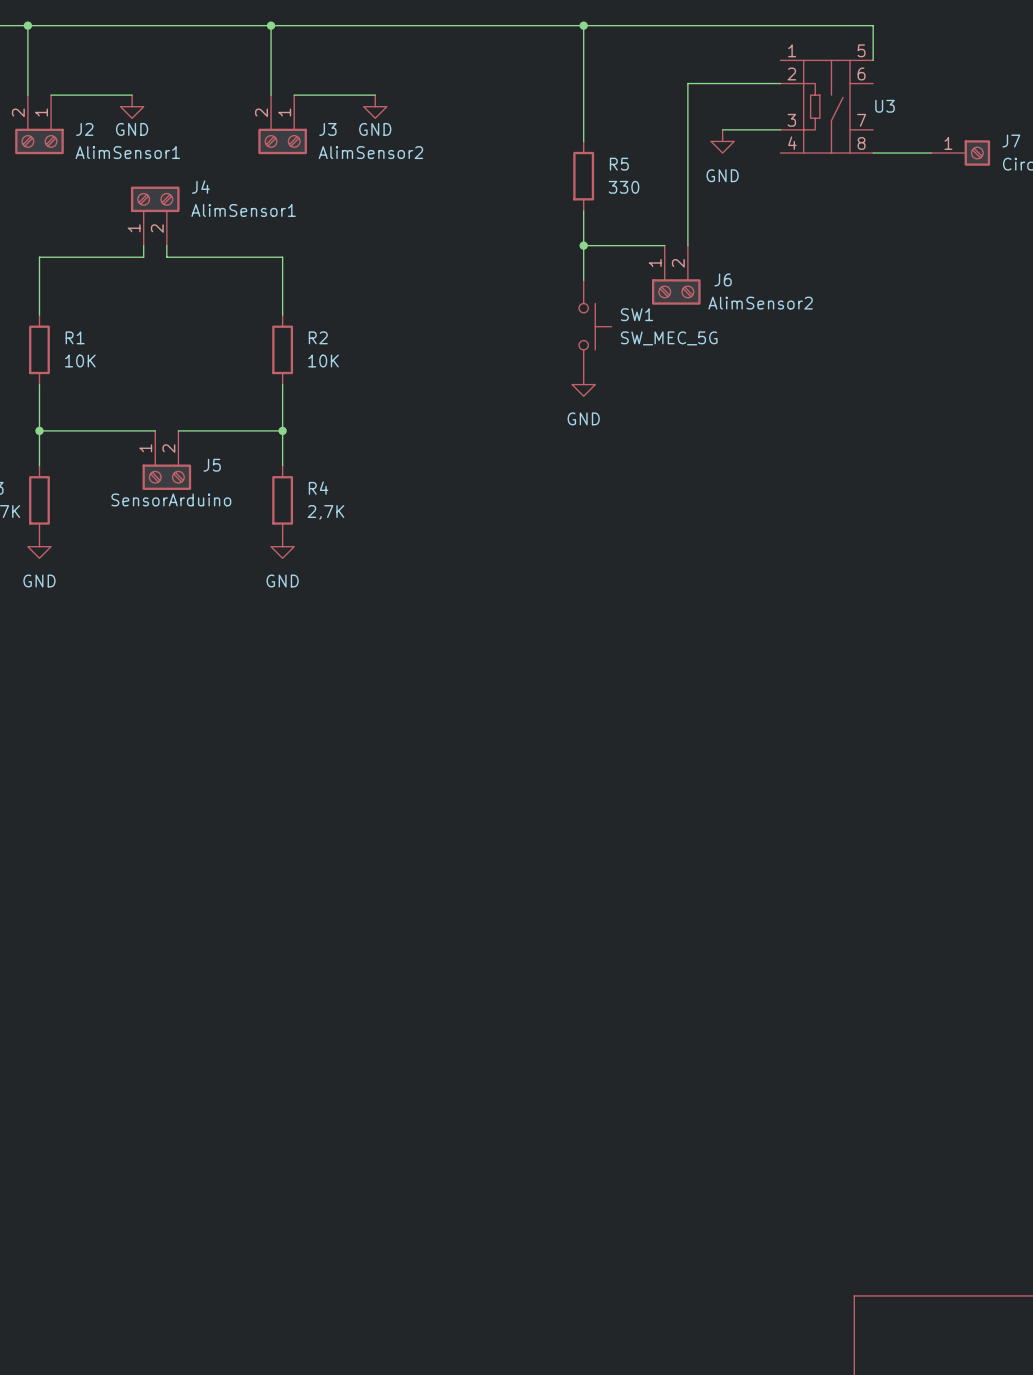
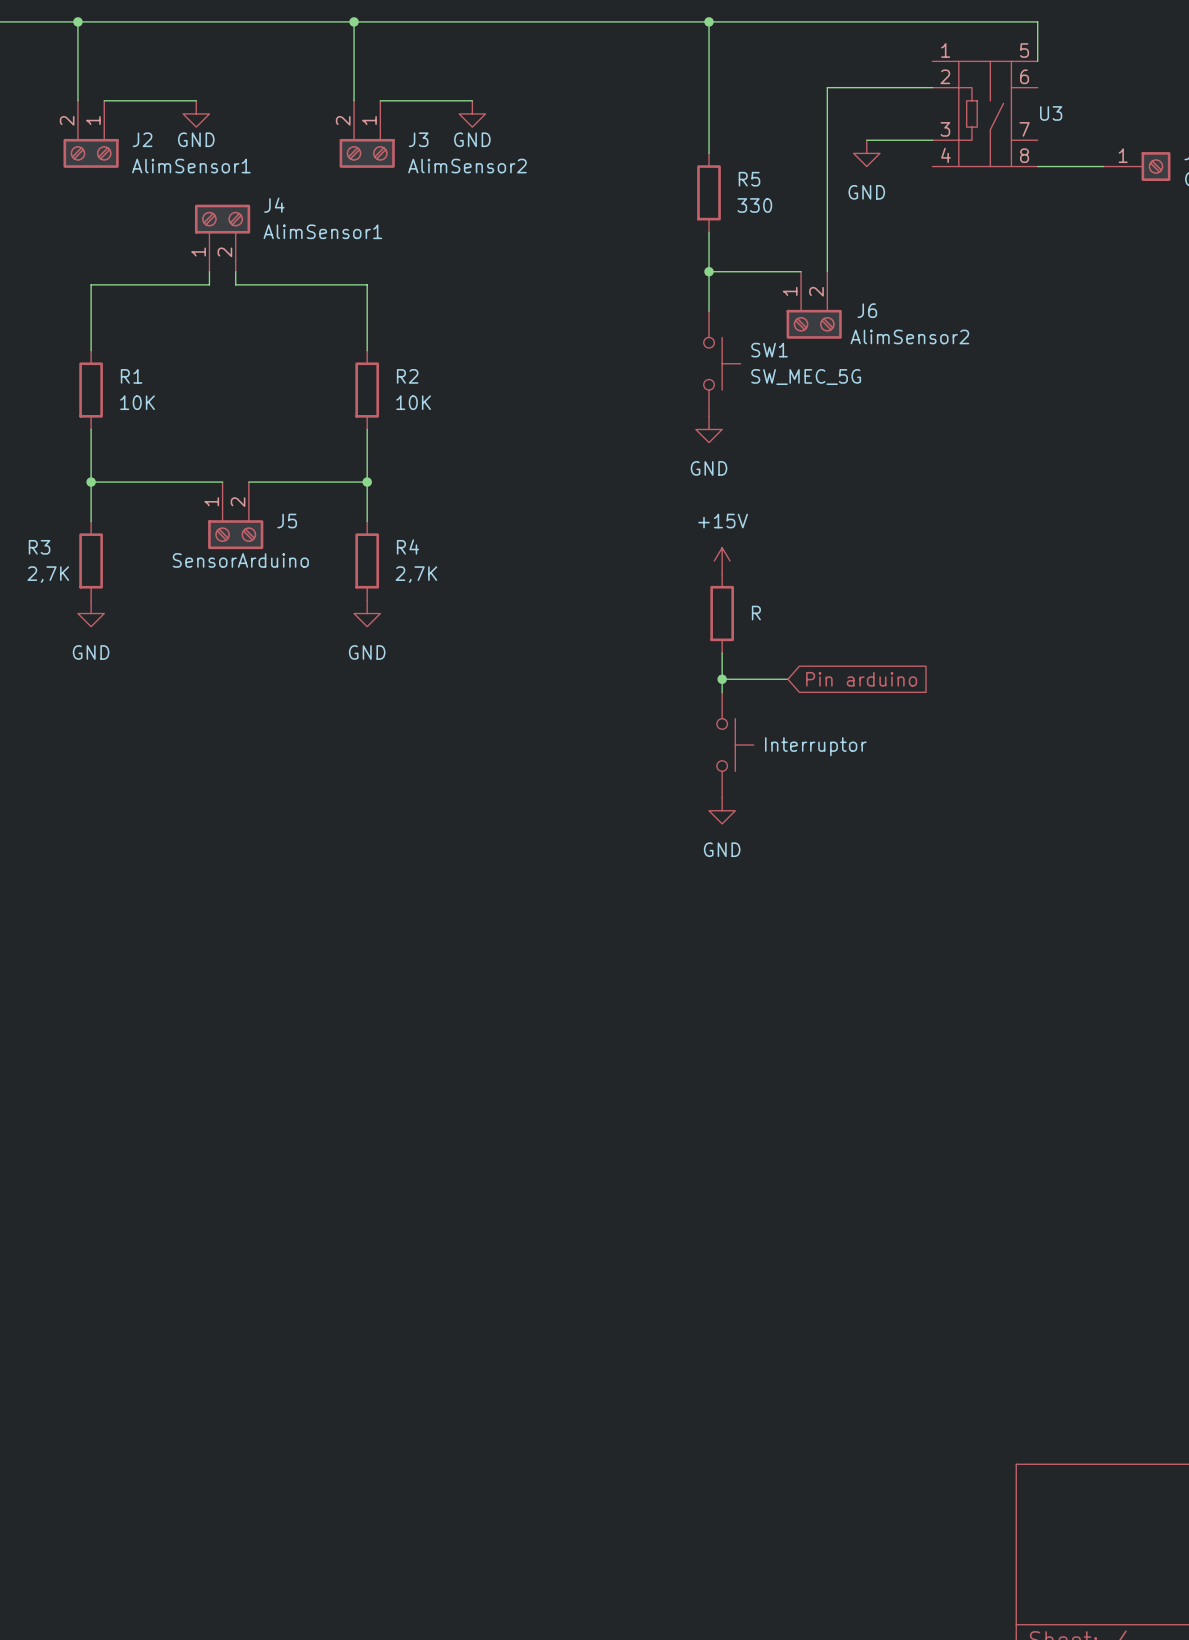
power symbol: none -> +15V (722, 560)
part: none -> R (722, 613)
wire: none -> (722, 652) (722, 692)
wire: none -> (722, 679) (787, 679)
junction: none -> (722, 679)
global label: none -> Pin arduino (861, 679)
part: none -> Interruptor (735, 745)
power symbol: none -> GND (722, 810)

